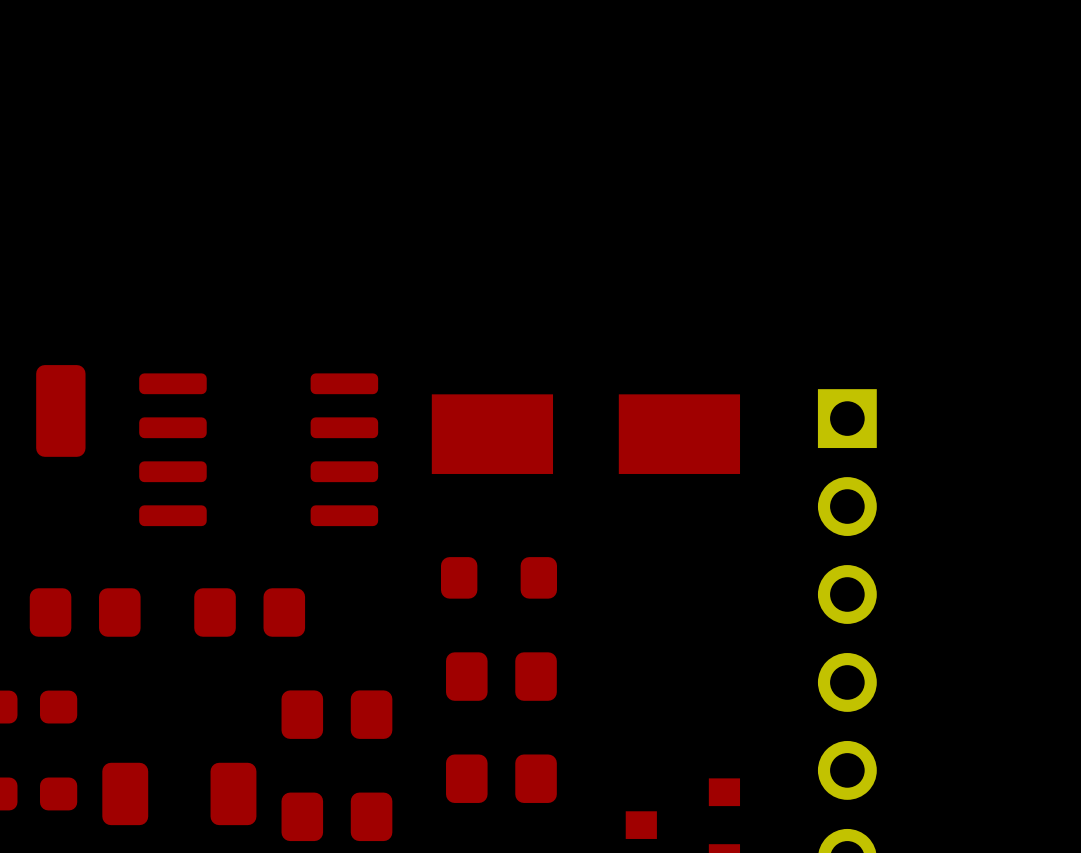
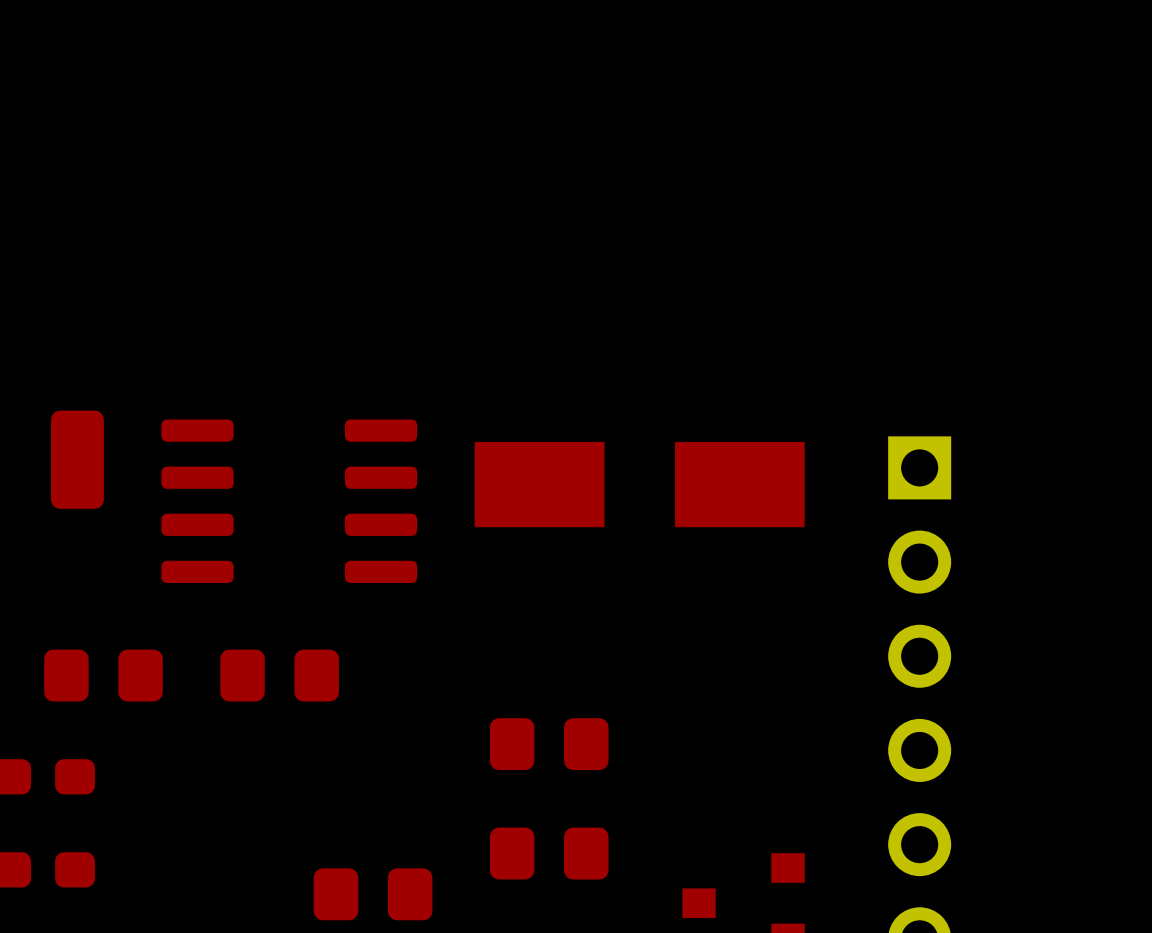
part: (499, 577) -> none
part: (336, 714) -> none
part: (179, 793) -> none

